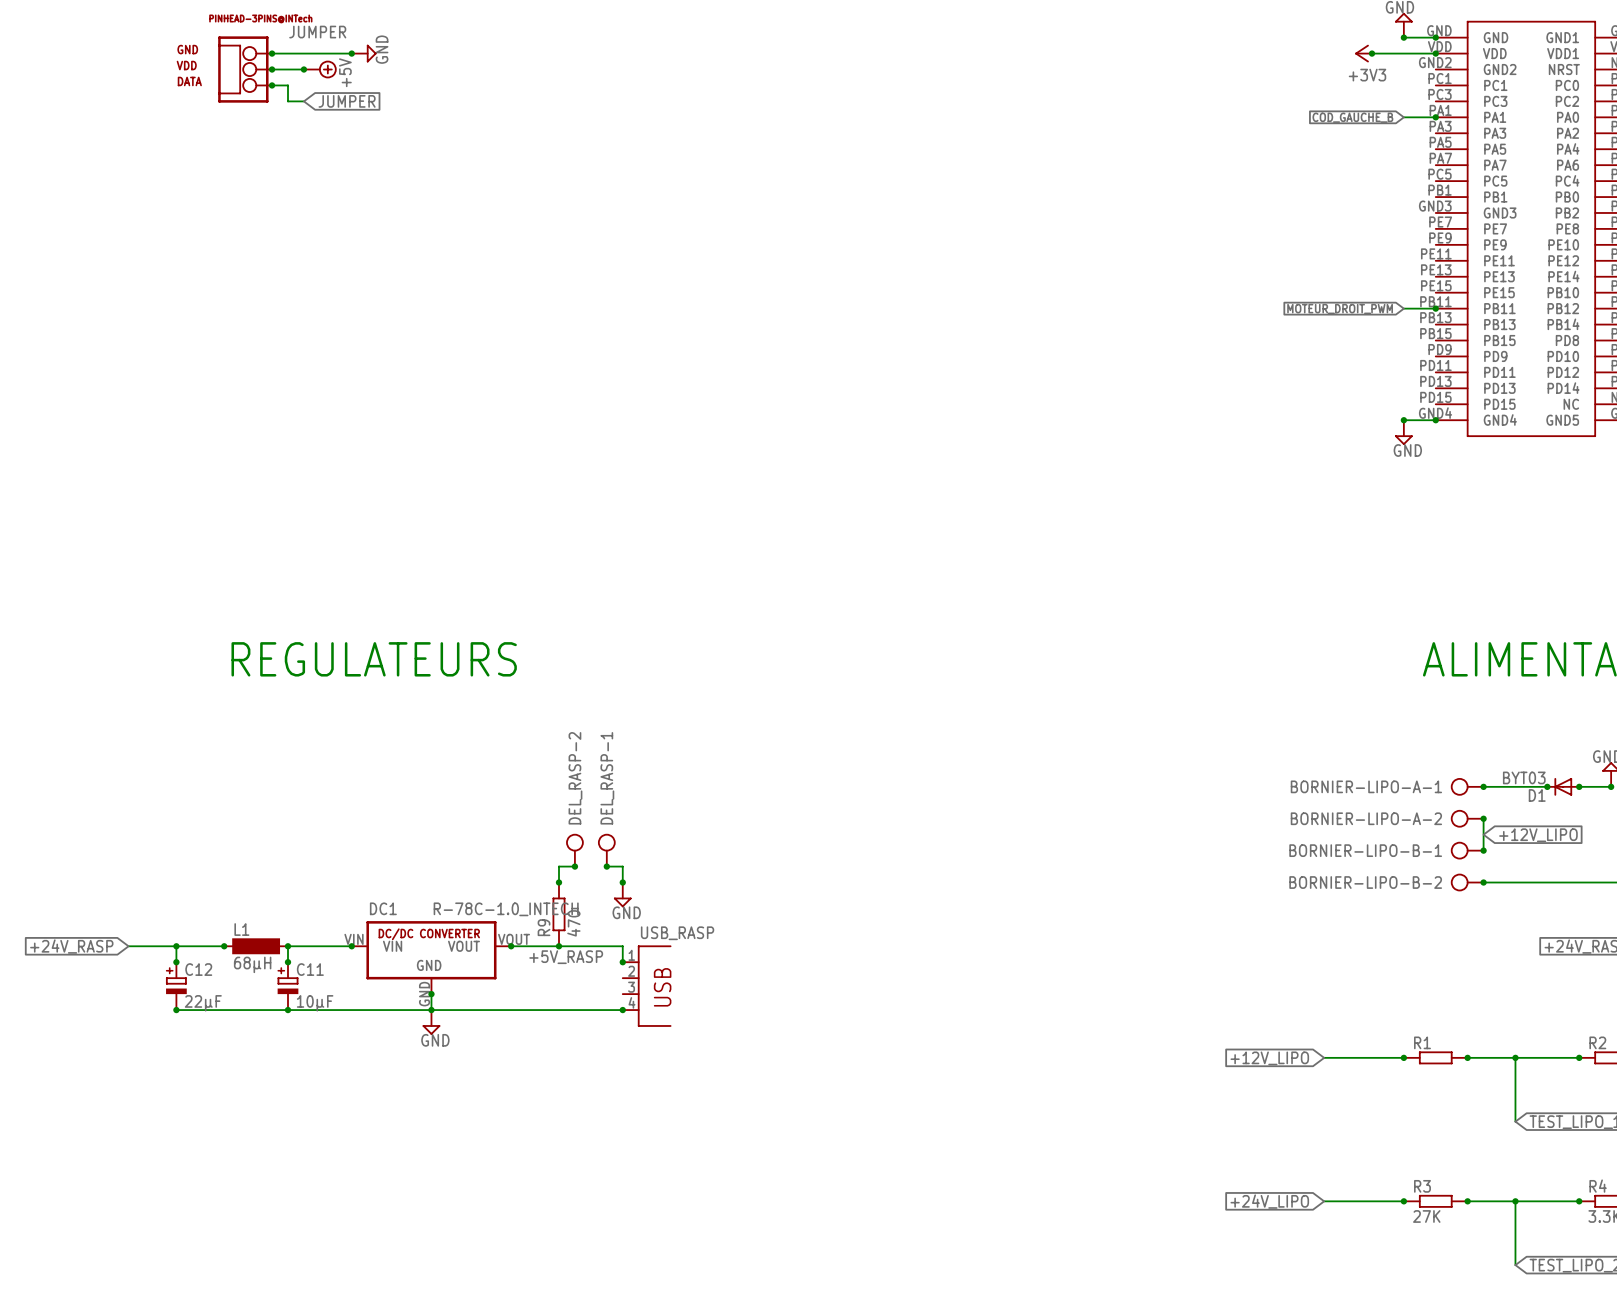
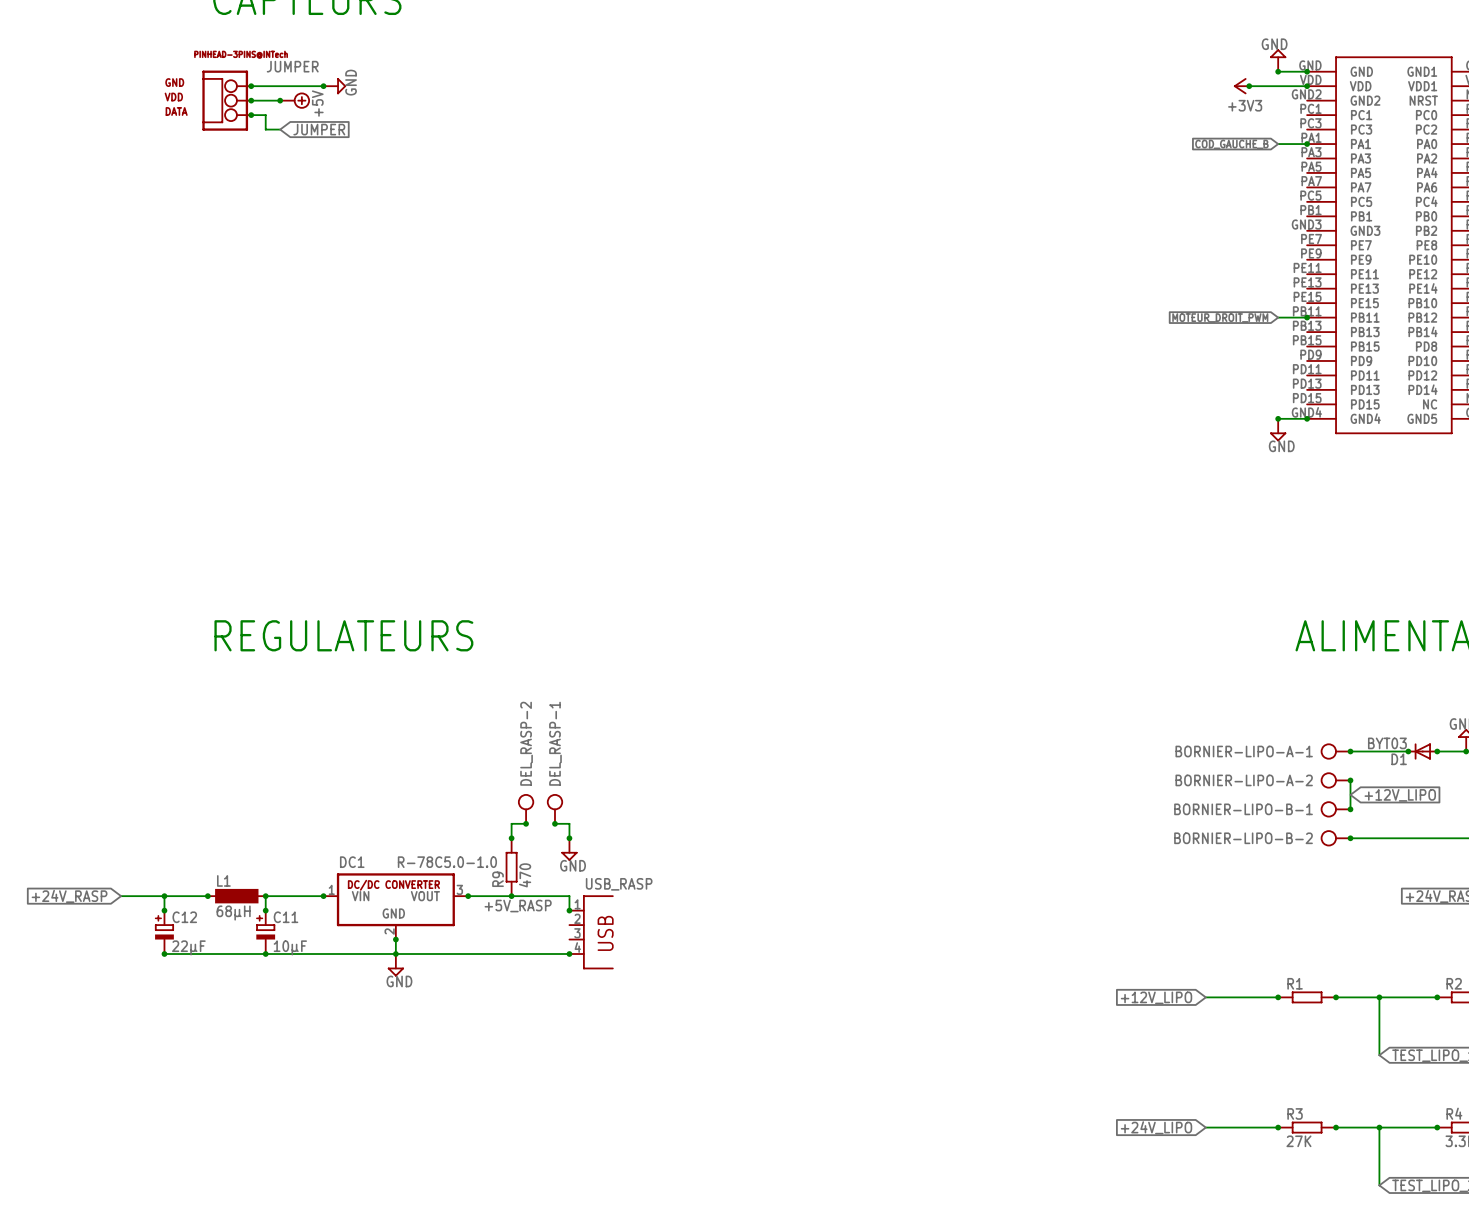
DC1 value: R-78C-1.0_INTECH (506, 909) -> R-78C5.0-1.0 (447, 862)
DC1 pin number: VIN (354, 939) -> 1 (331, 889)
DC1 pin number: VOUT (514, 939) -> 3 (459, 889)
DC1 pin number: GND (424, 994) -> 2 (389, 931)

